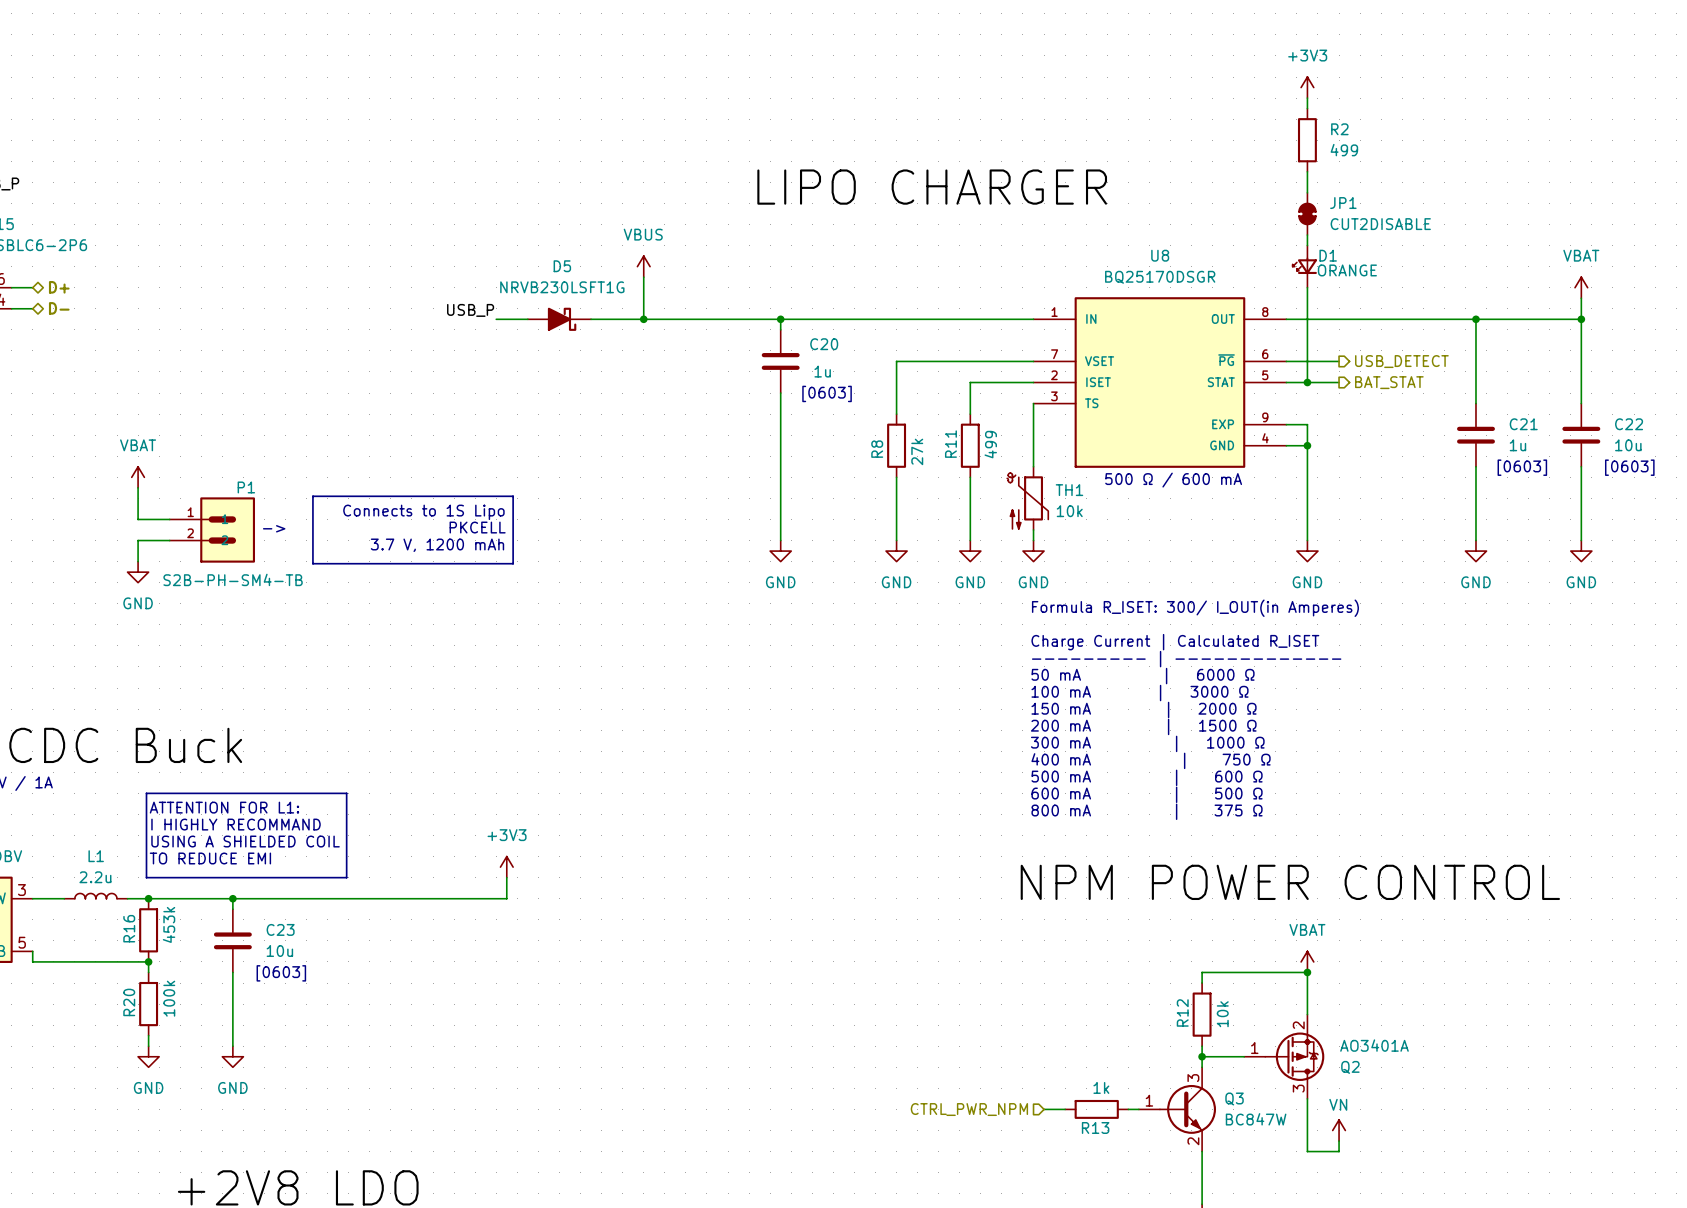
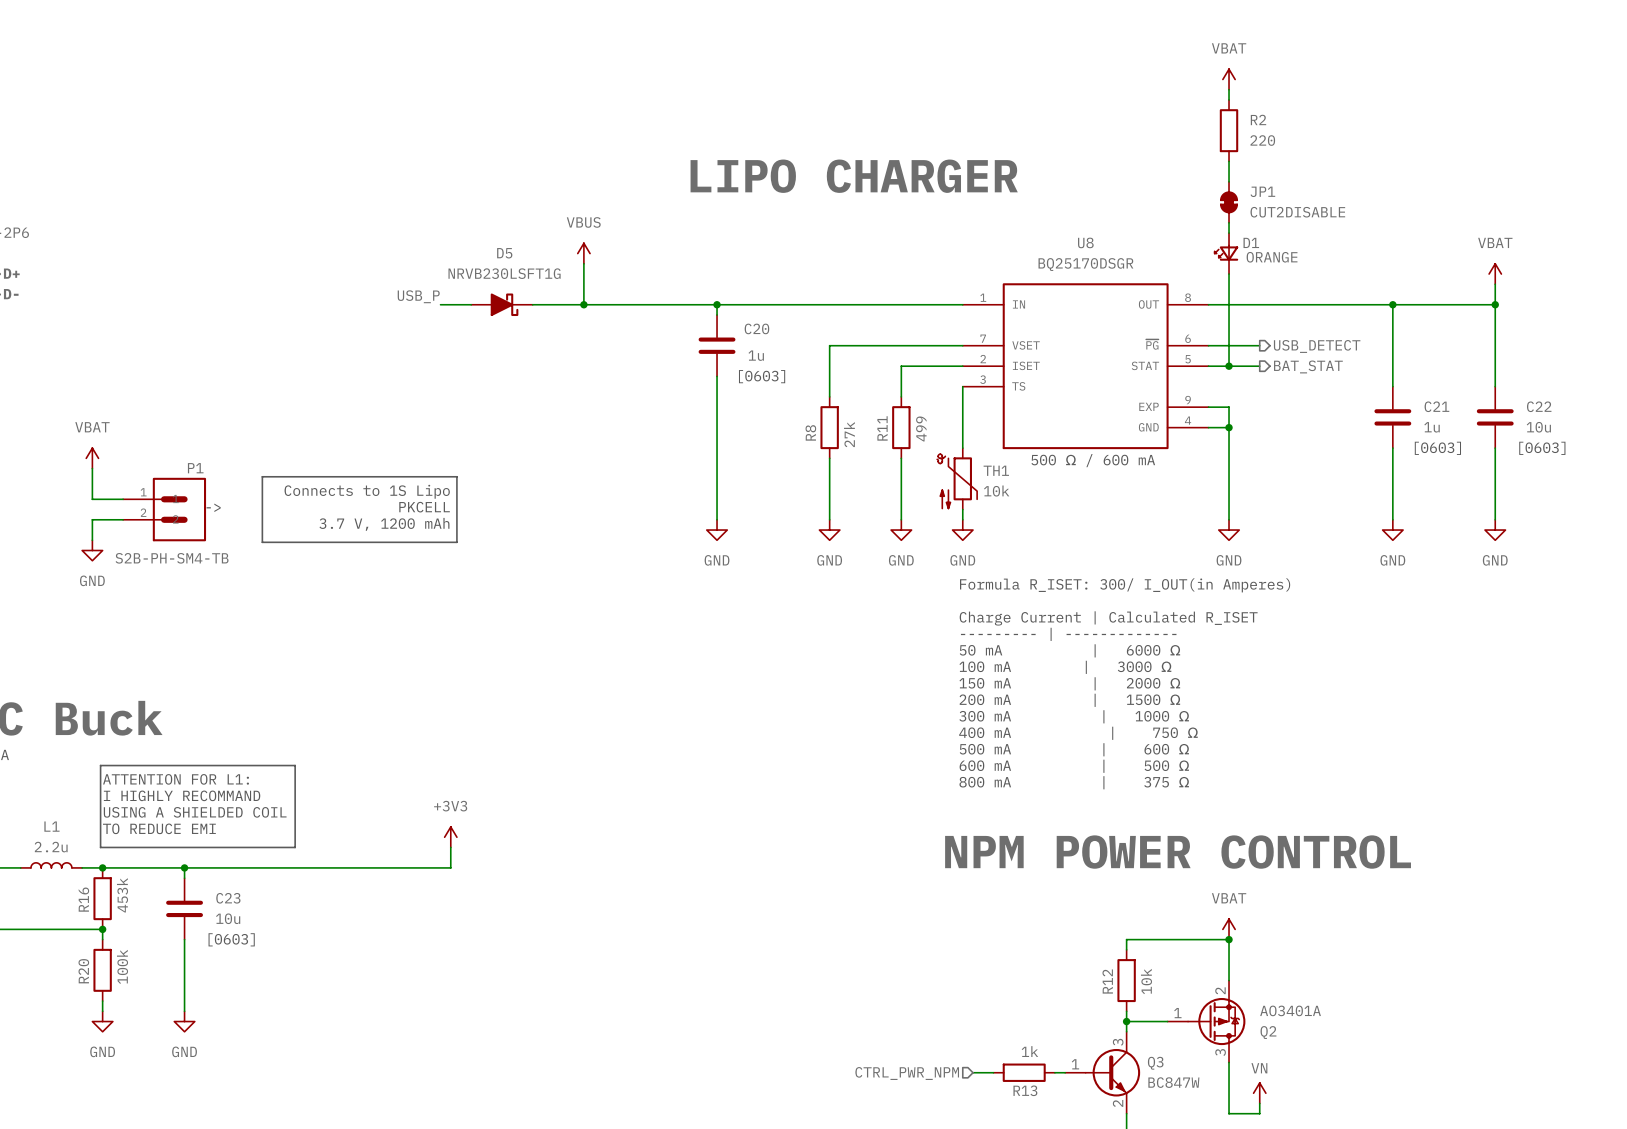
power symbol: +3V3 (1307, 87) -> VBAT (1229, 79)
R2 value: 499 (1344, 150) -> 220 (1262, 140)

